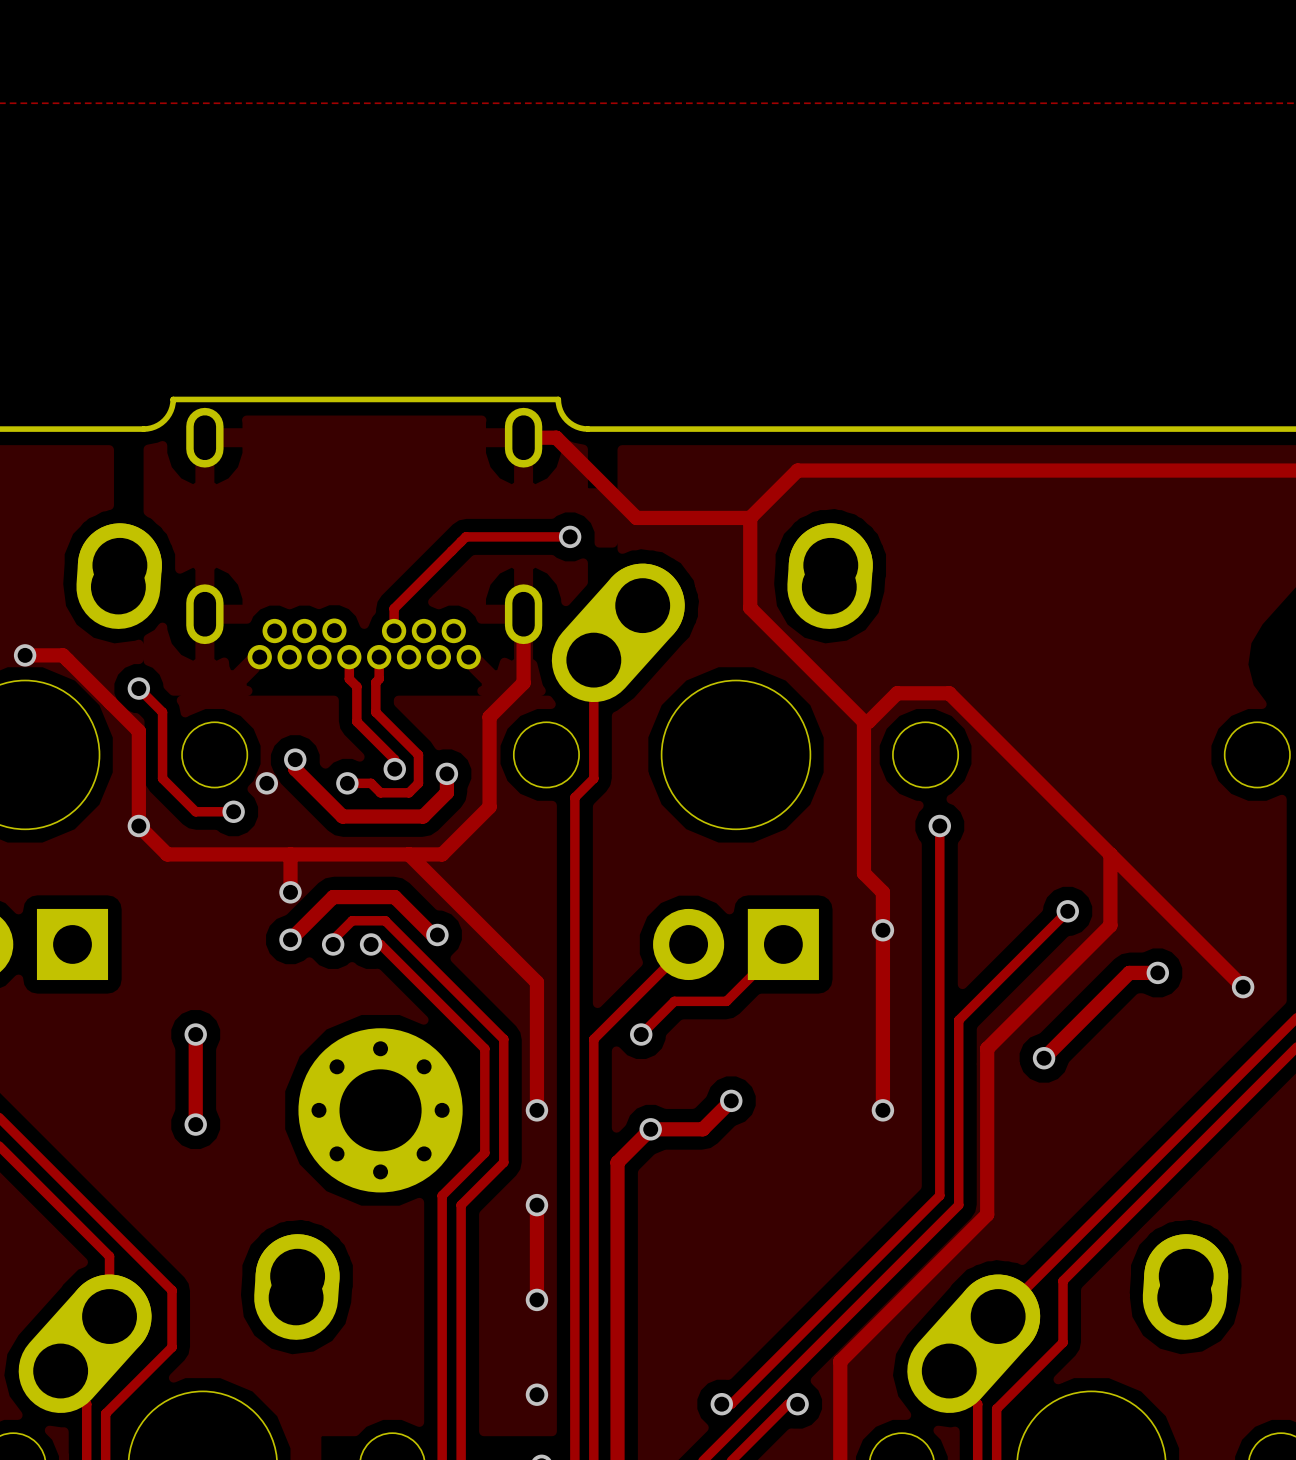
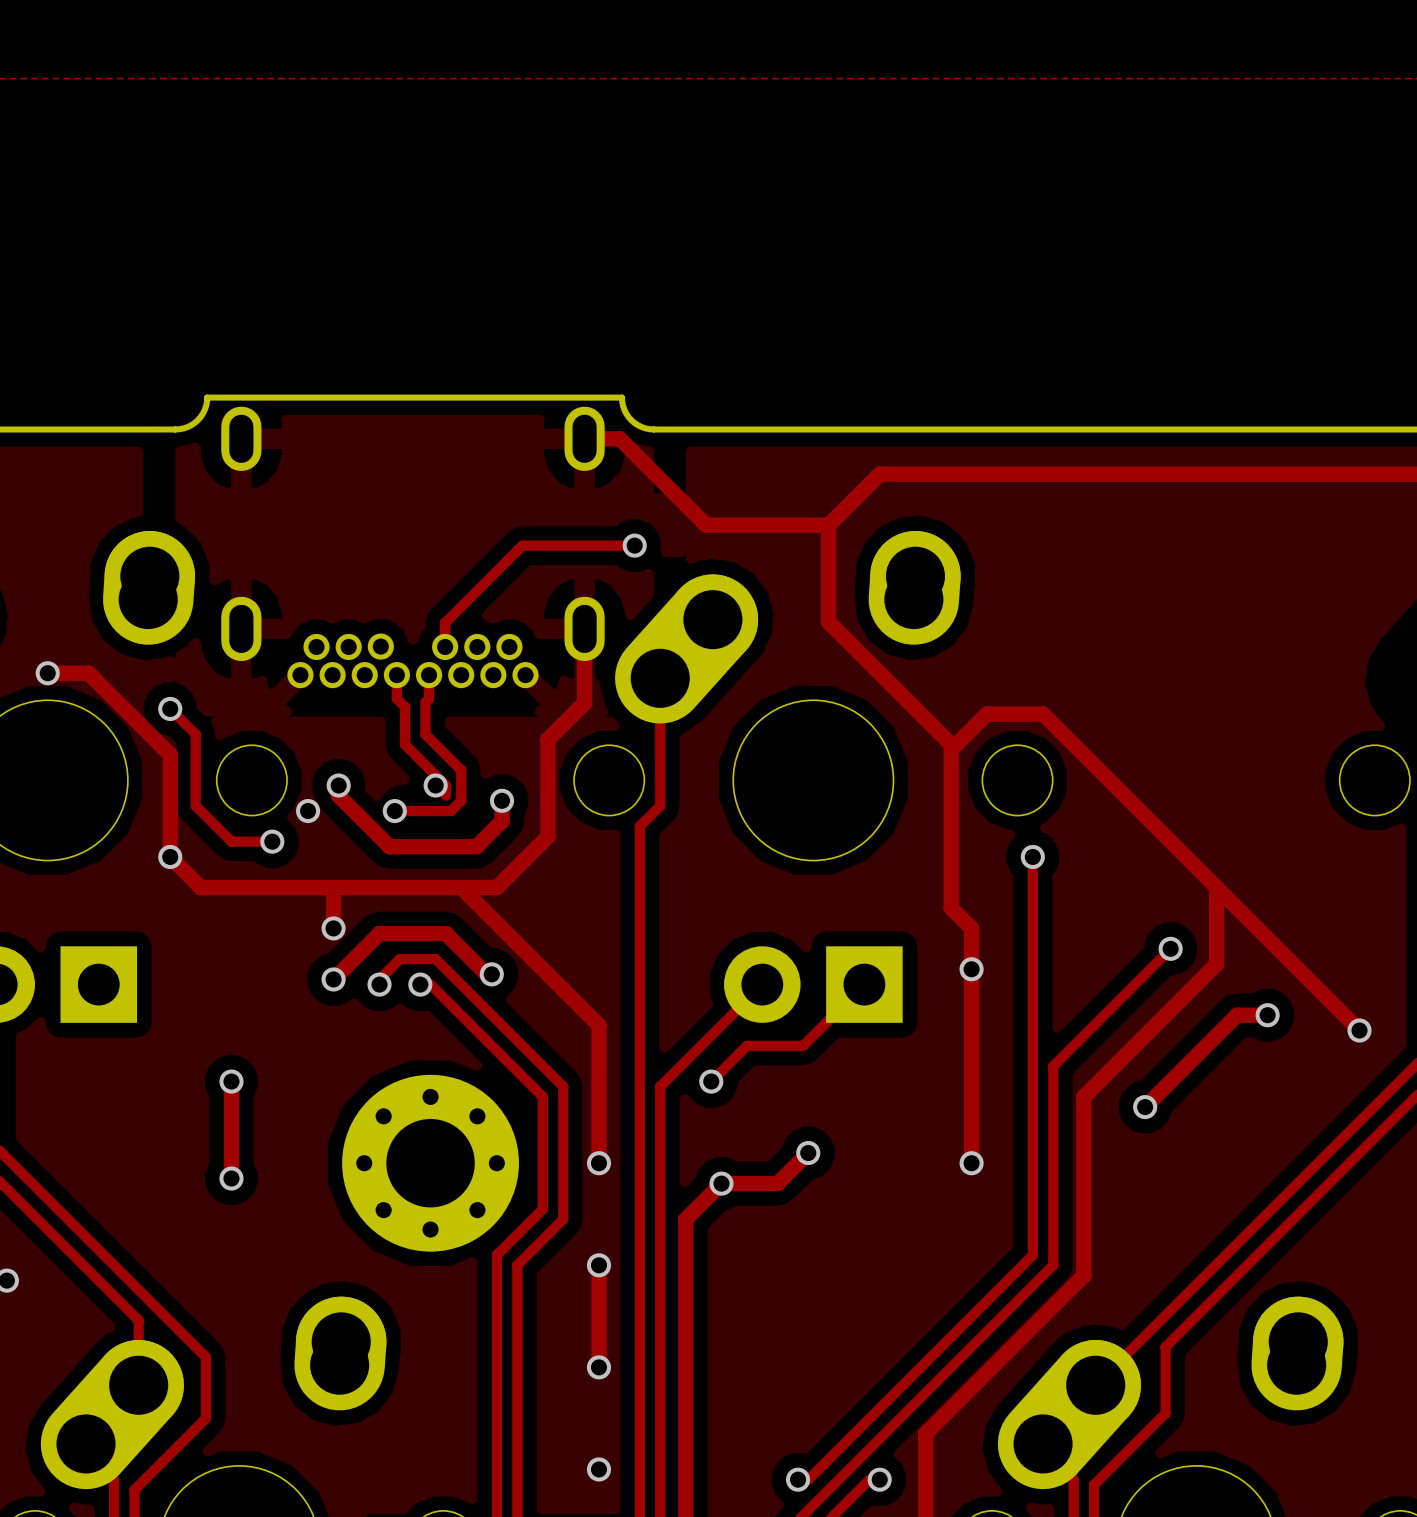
track: (408, 745) (418, 754) (418, 783) (408, 792) (380, 792) (371, 783) -> (461, 770) (461, 800) (450, 811) (420, 811)
via position: (394, 769) -> (435, 785)

